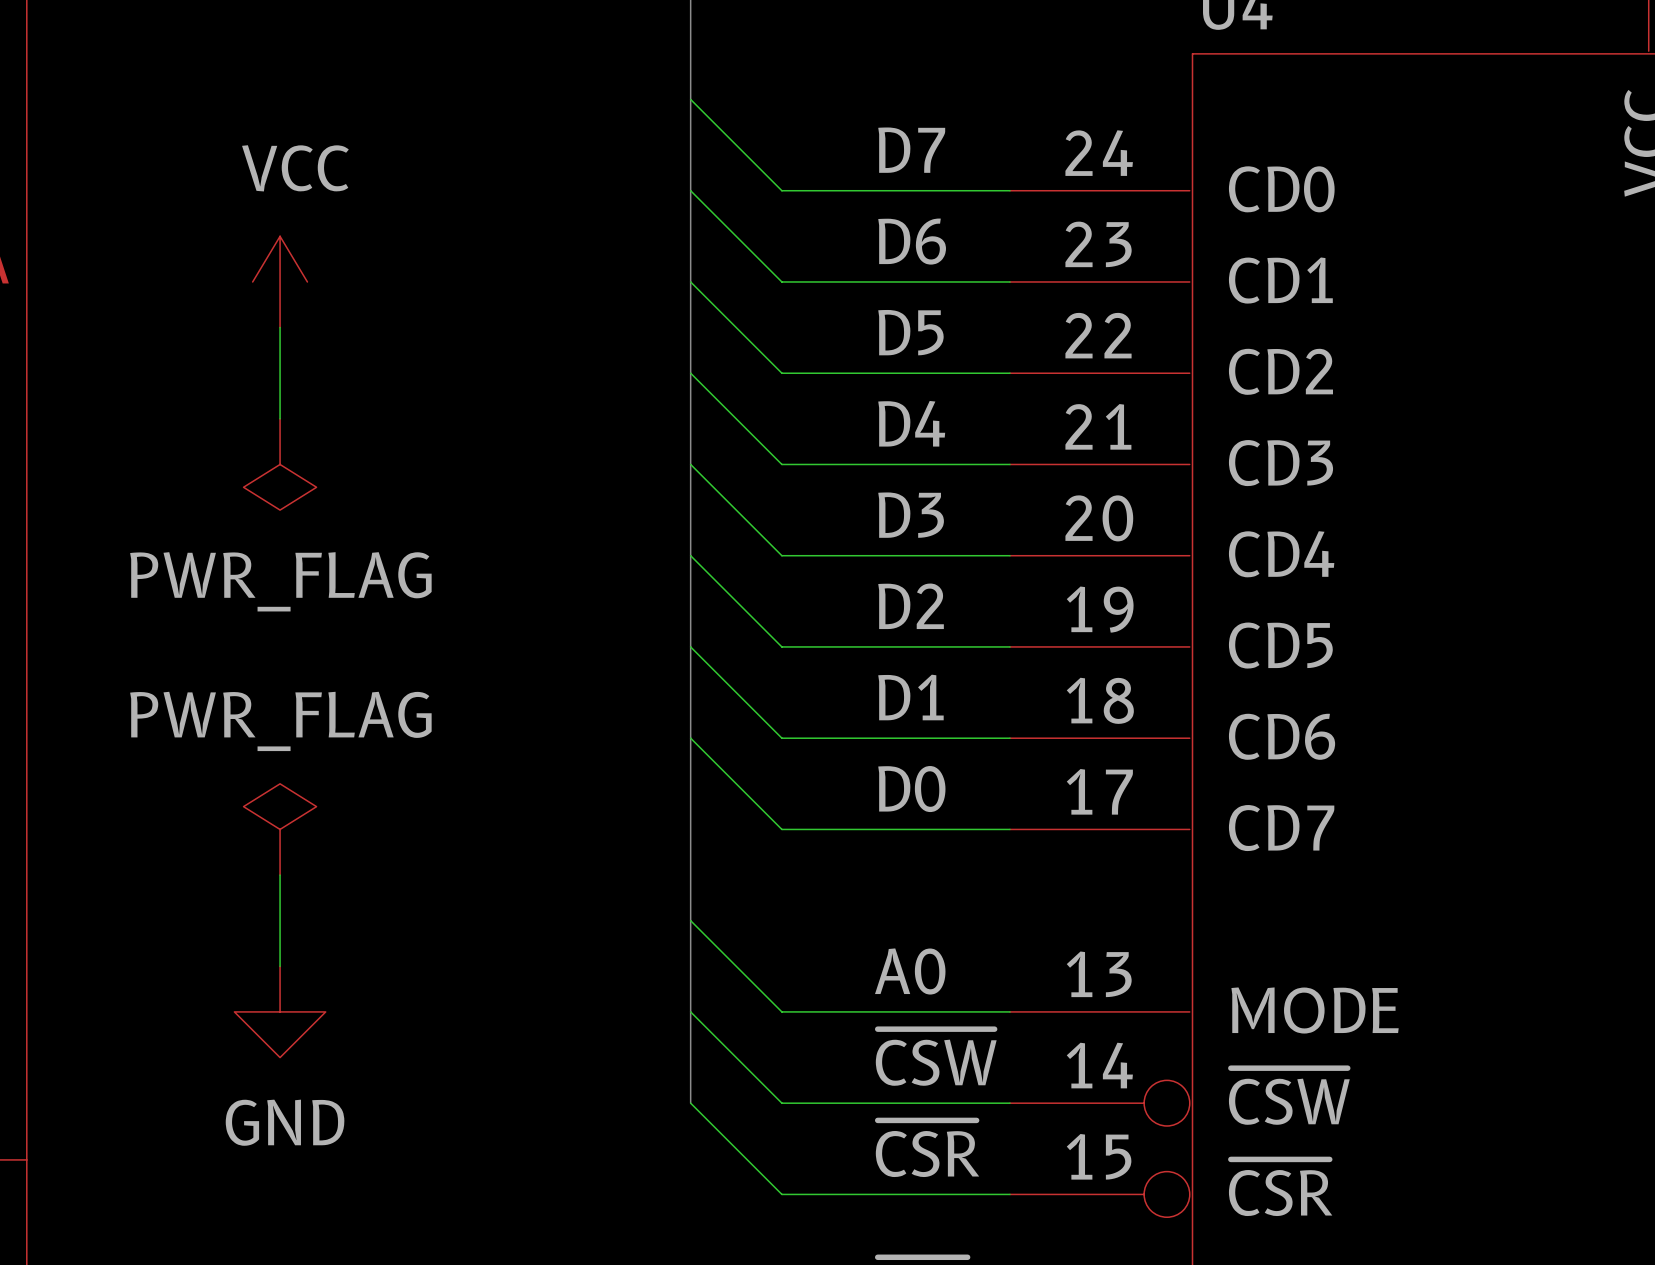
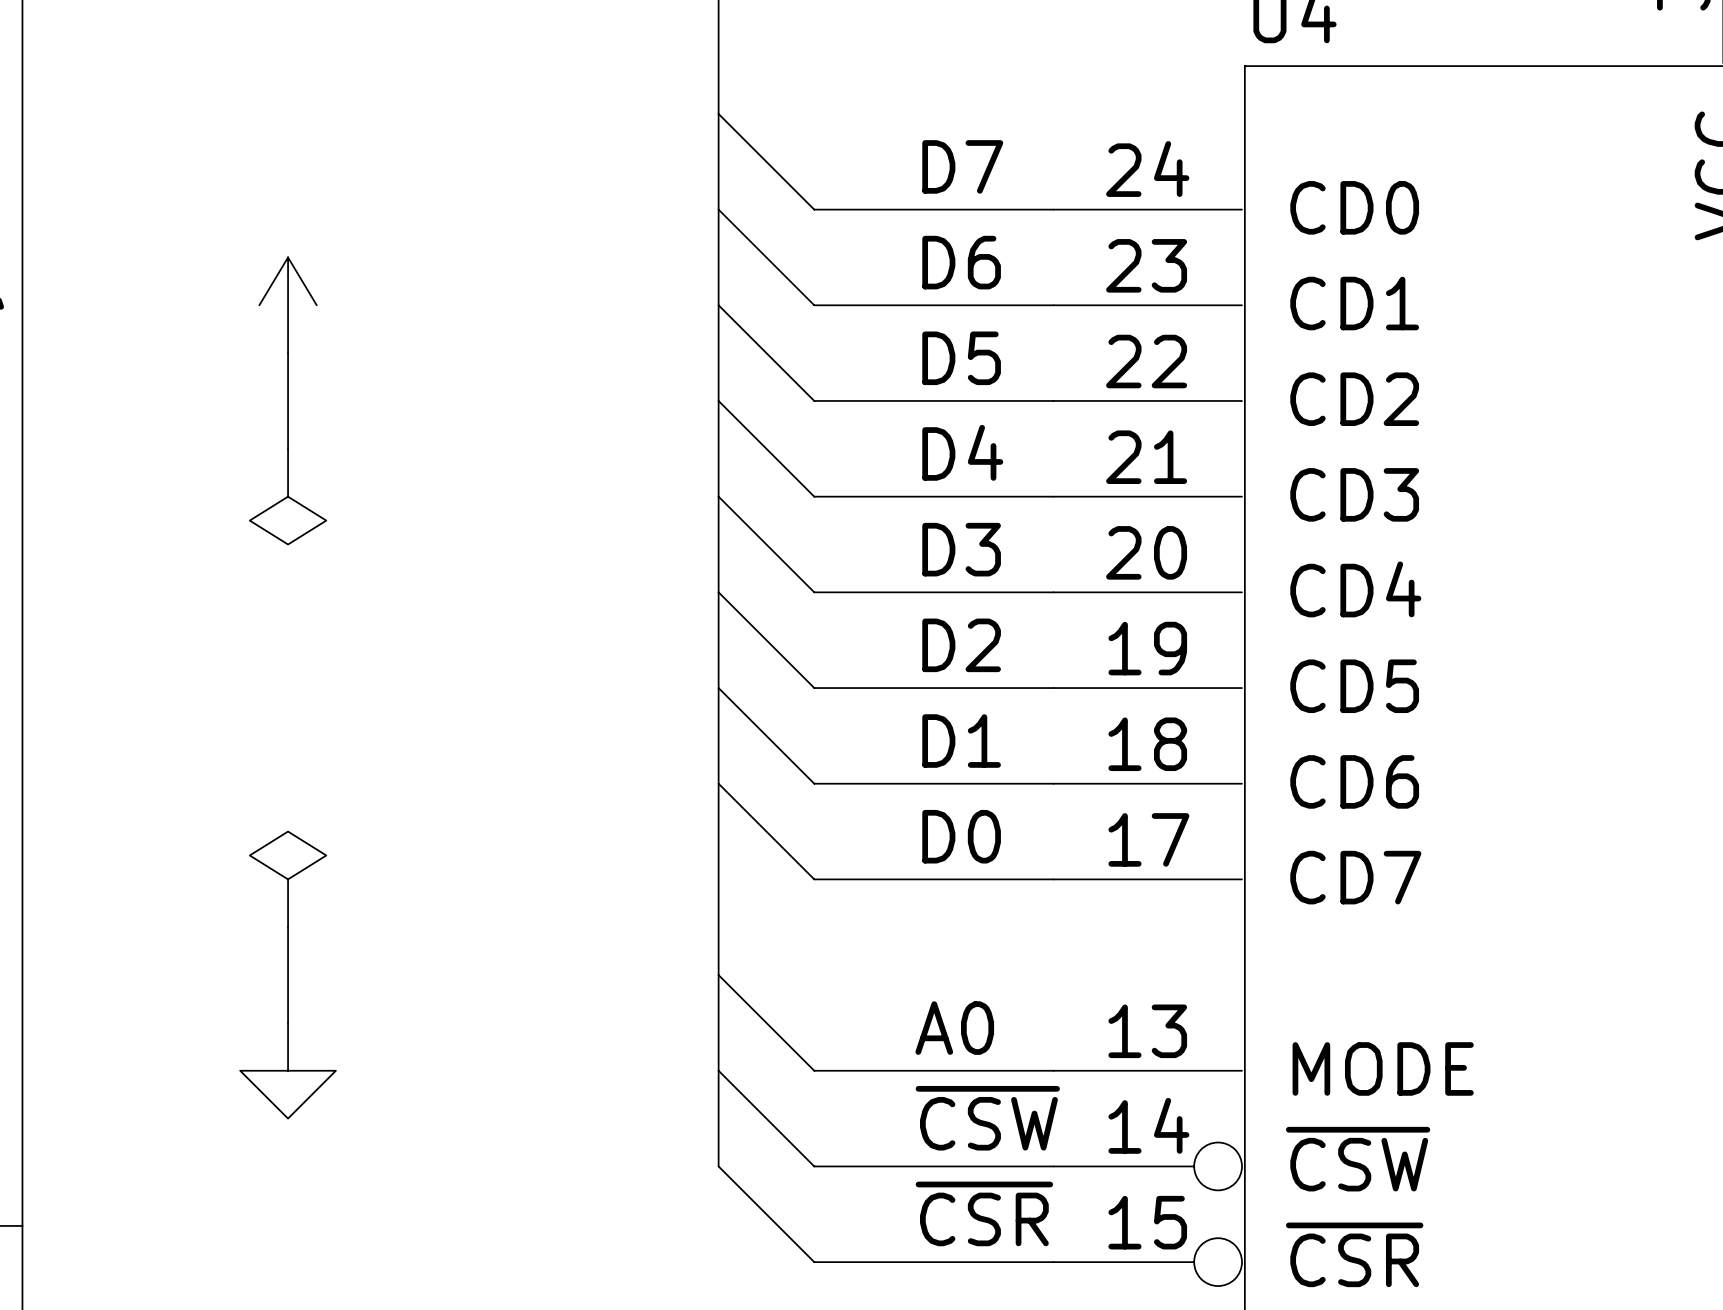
power symbol text: VCC (295, 168) -> none
power symbol text: PWR_FLAG (280, 581) -> none
power symbol text: PWR_FLAG (280, 721) -> none
power symbol text: GND (285, 1122) -> none

